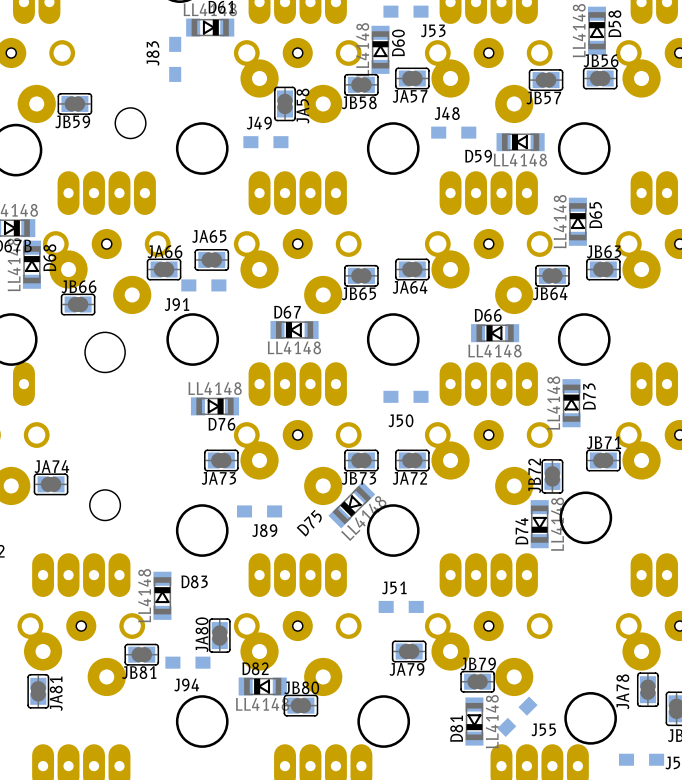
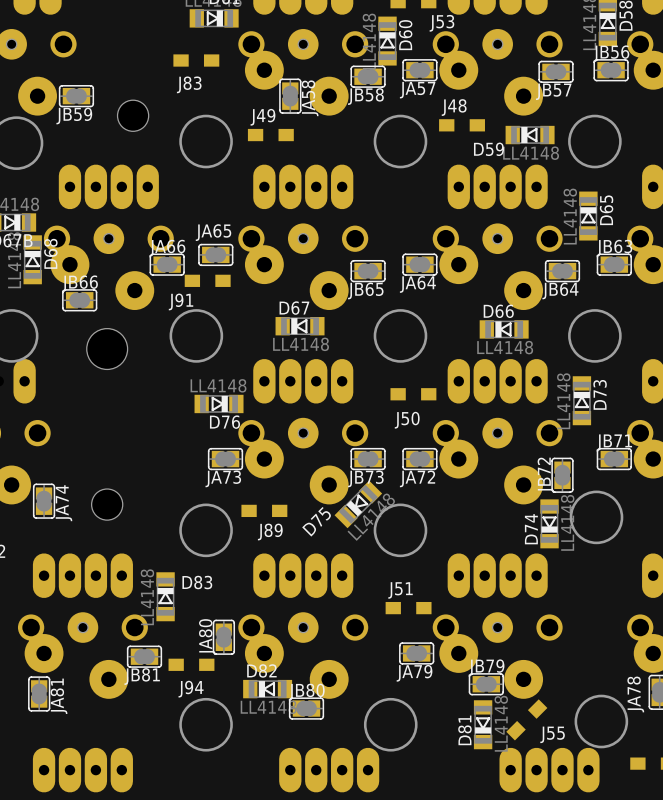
J83 name position: J83 (152, 53) -> J83 (189, 84)
J83 rotation: 0° (175, 59) -> 90° clockwise (196, 60)
JA74 rotation: 0° (51, 484) -> 90° clockwise (44, 501)

